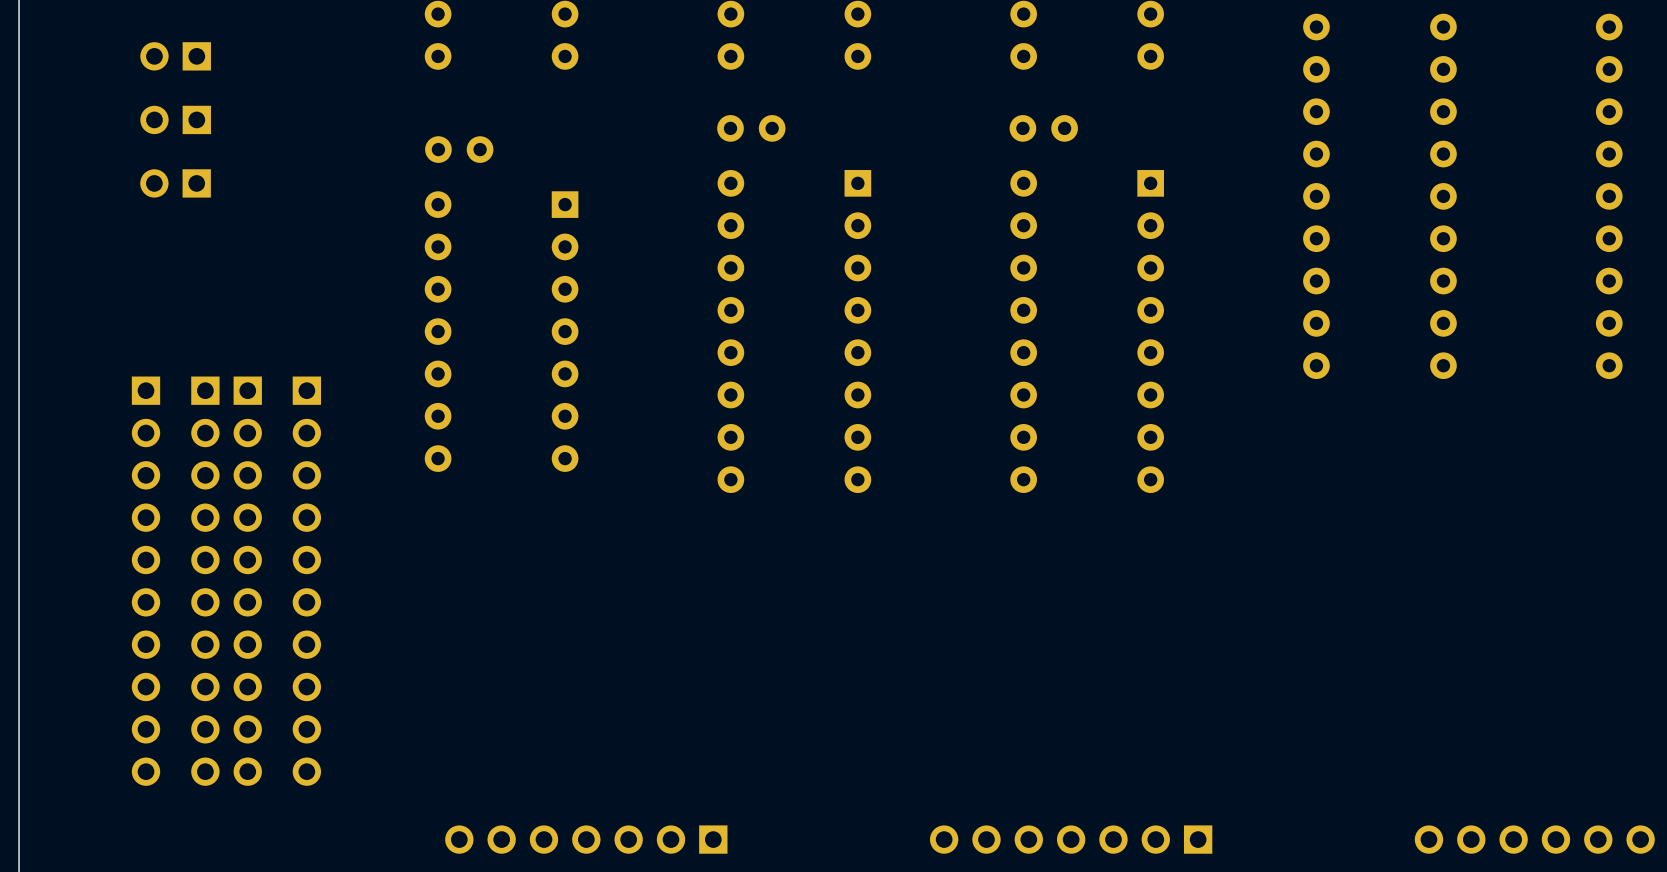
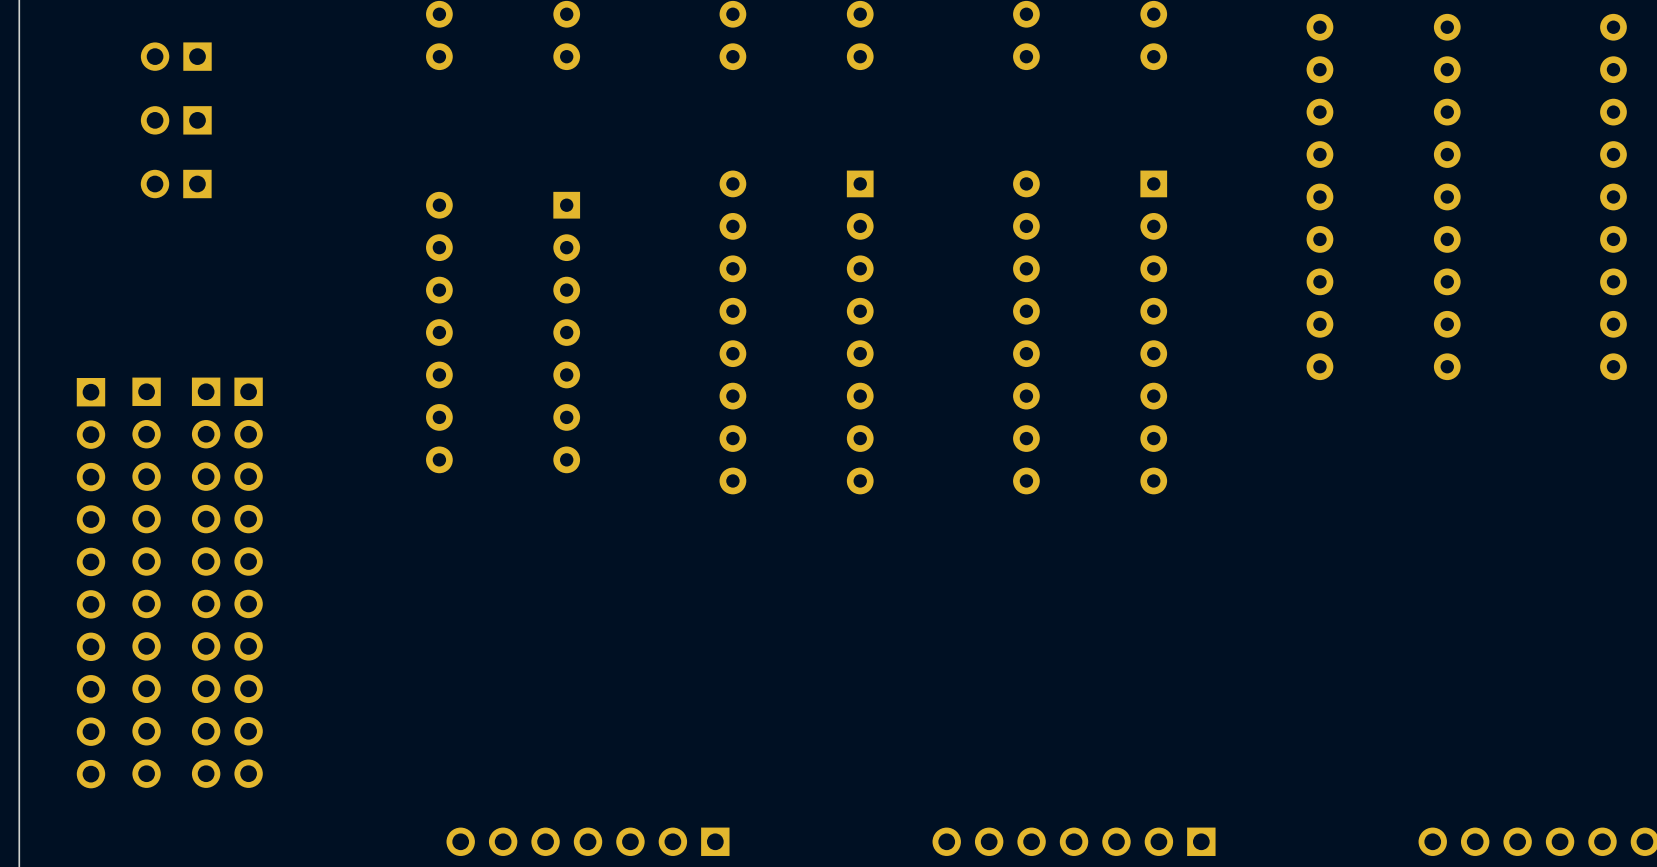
part: (751, 128) -> none
part: (1043, 128) -> none
part: (459, 149) -> none
part position: (306, 581) -> (90, 583)

